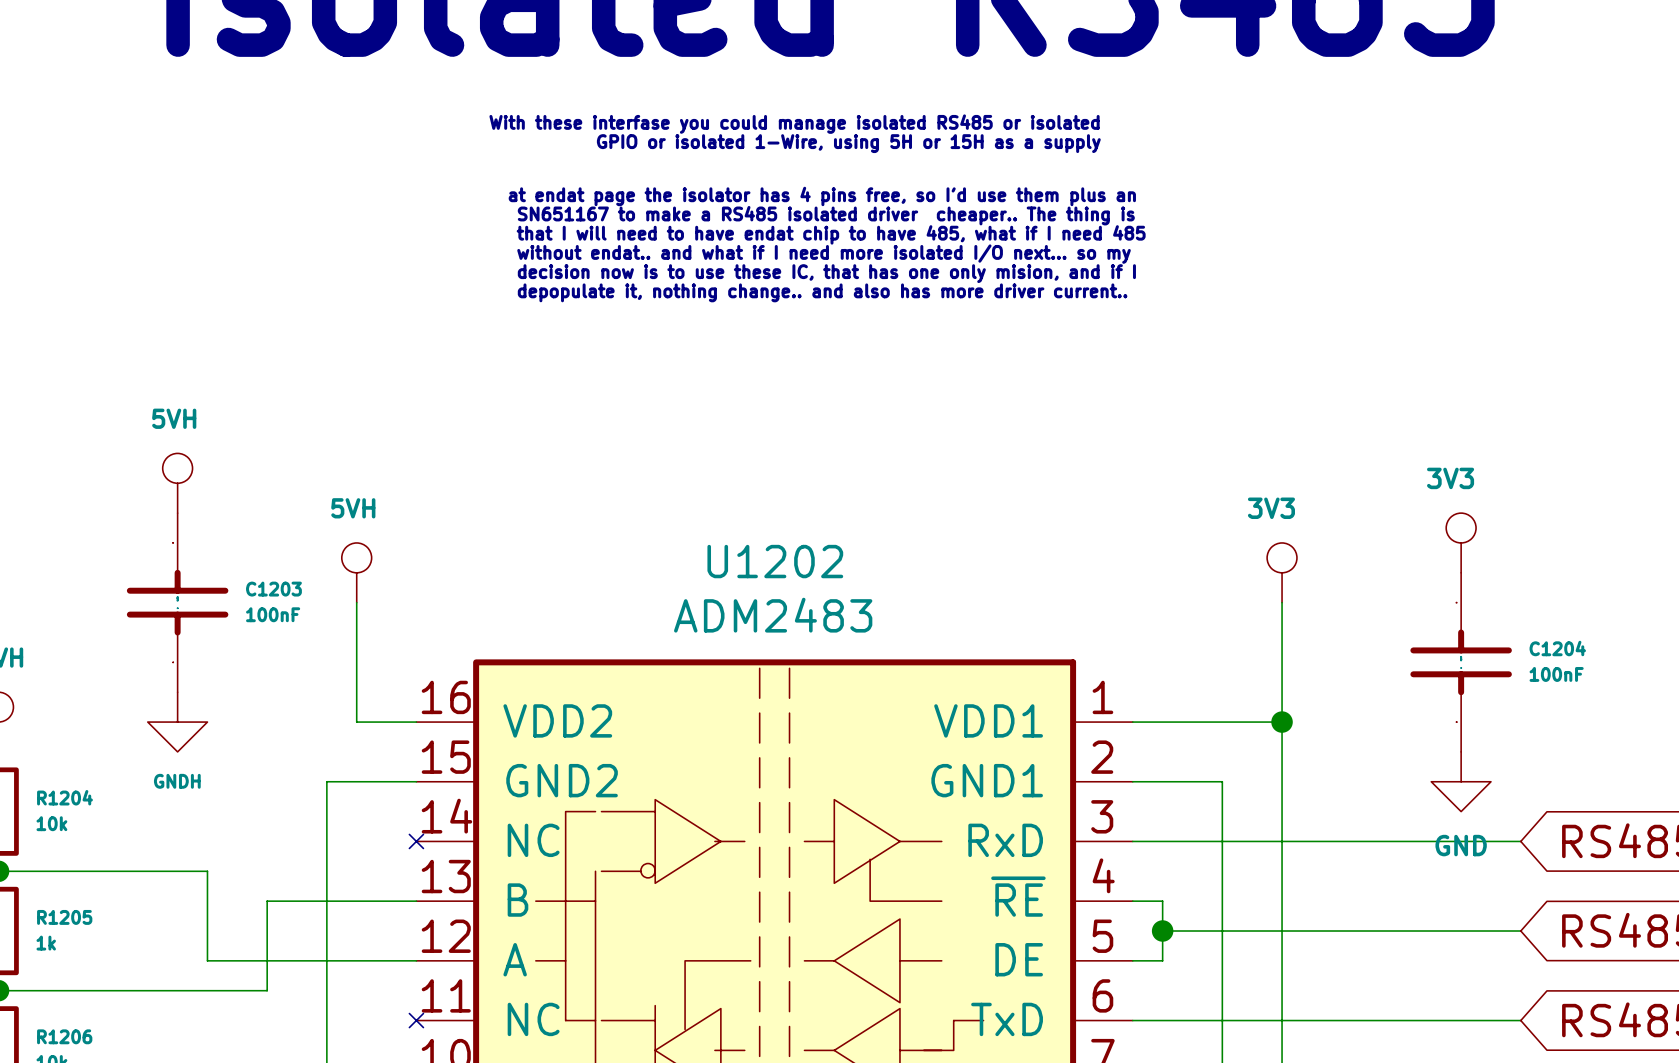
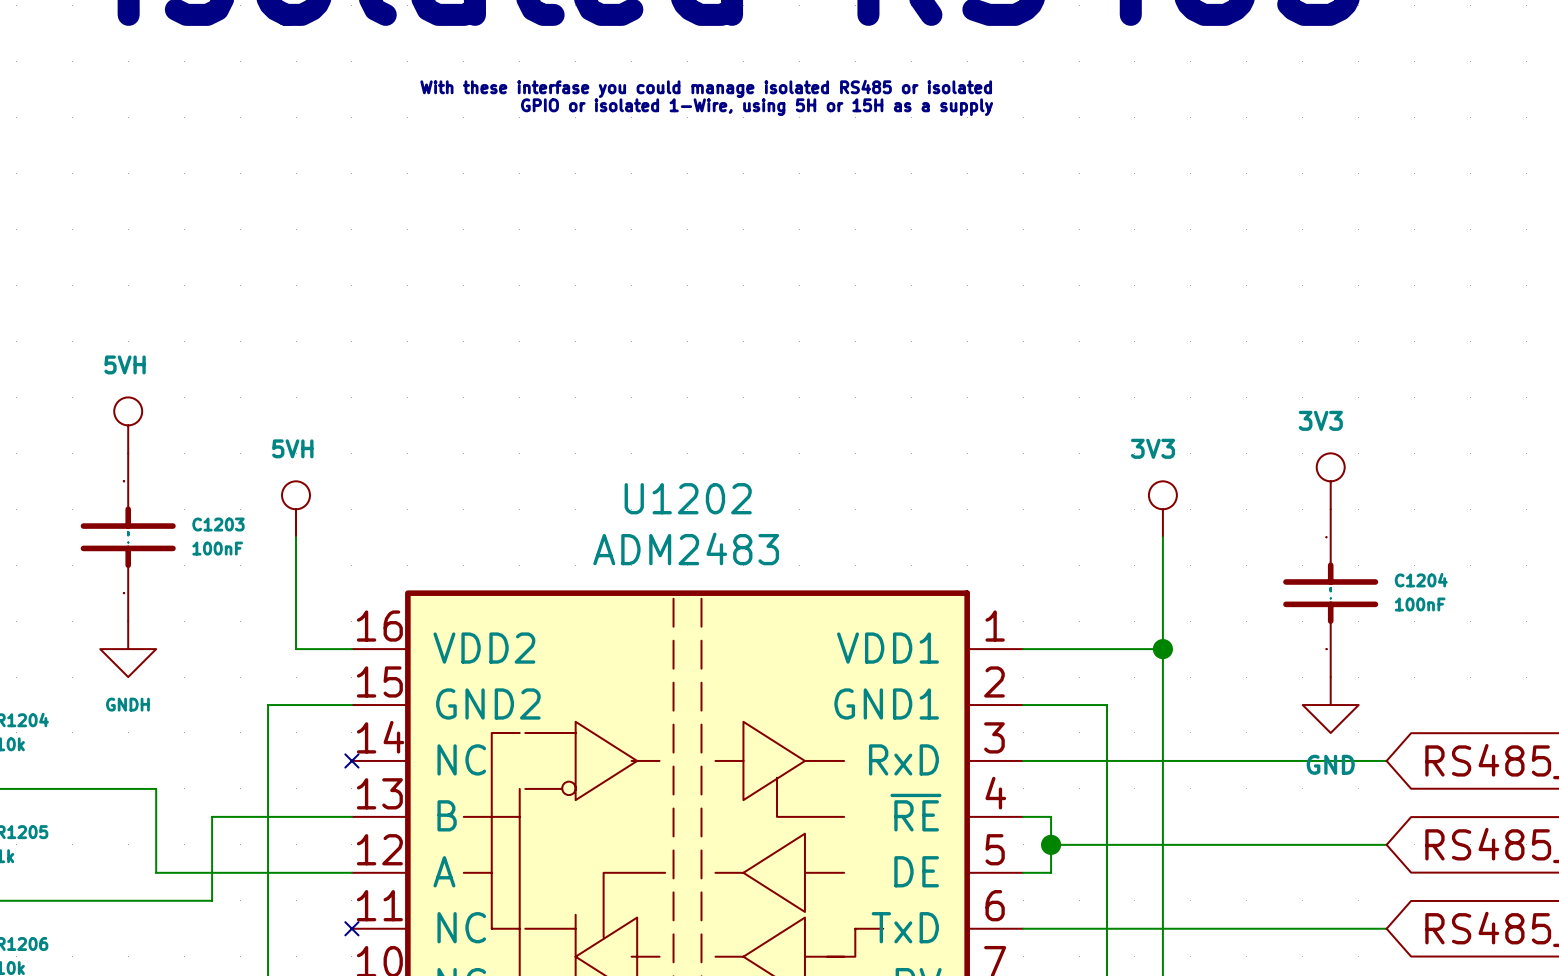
text: at endat page the isolator has 4 pins free, so I'd use them plus an (822, 196) -> none
text: SN651167 to make a RS485 isolated driver cheaper.. The thing is (826, 215) -> none
text: that I will need to have endat chip to have 485, what if I need 485 (831, 234) -> none
text: without endat.. and what if I need more isolated I/O next... so my (824, 254) -> none
text: decision now is to use these IC, that has one only mision, and if I (826, 273) -> none
text: depopulate it, nothing change.. and also has more driver current.. (822, 292) -> none

